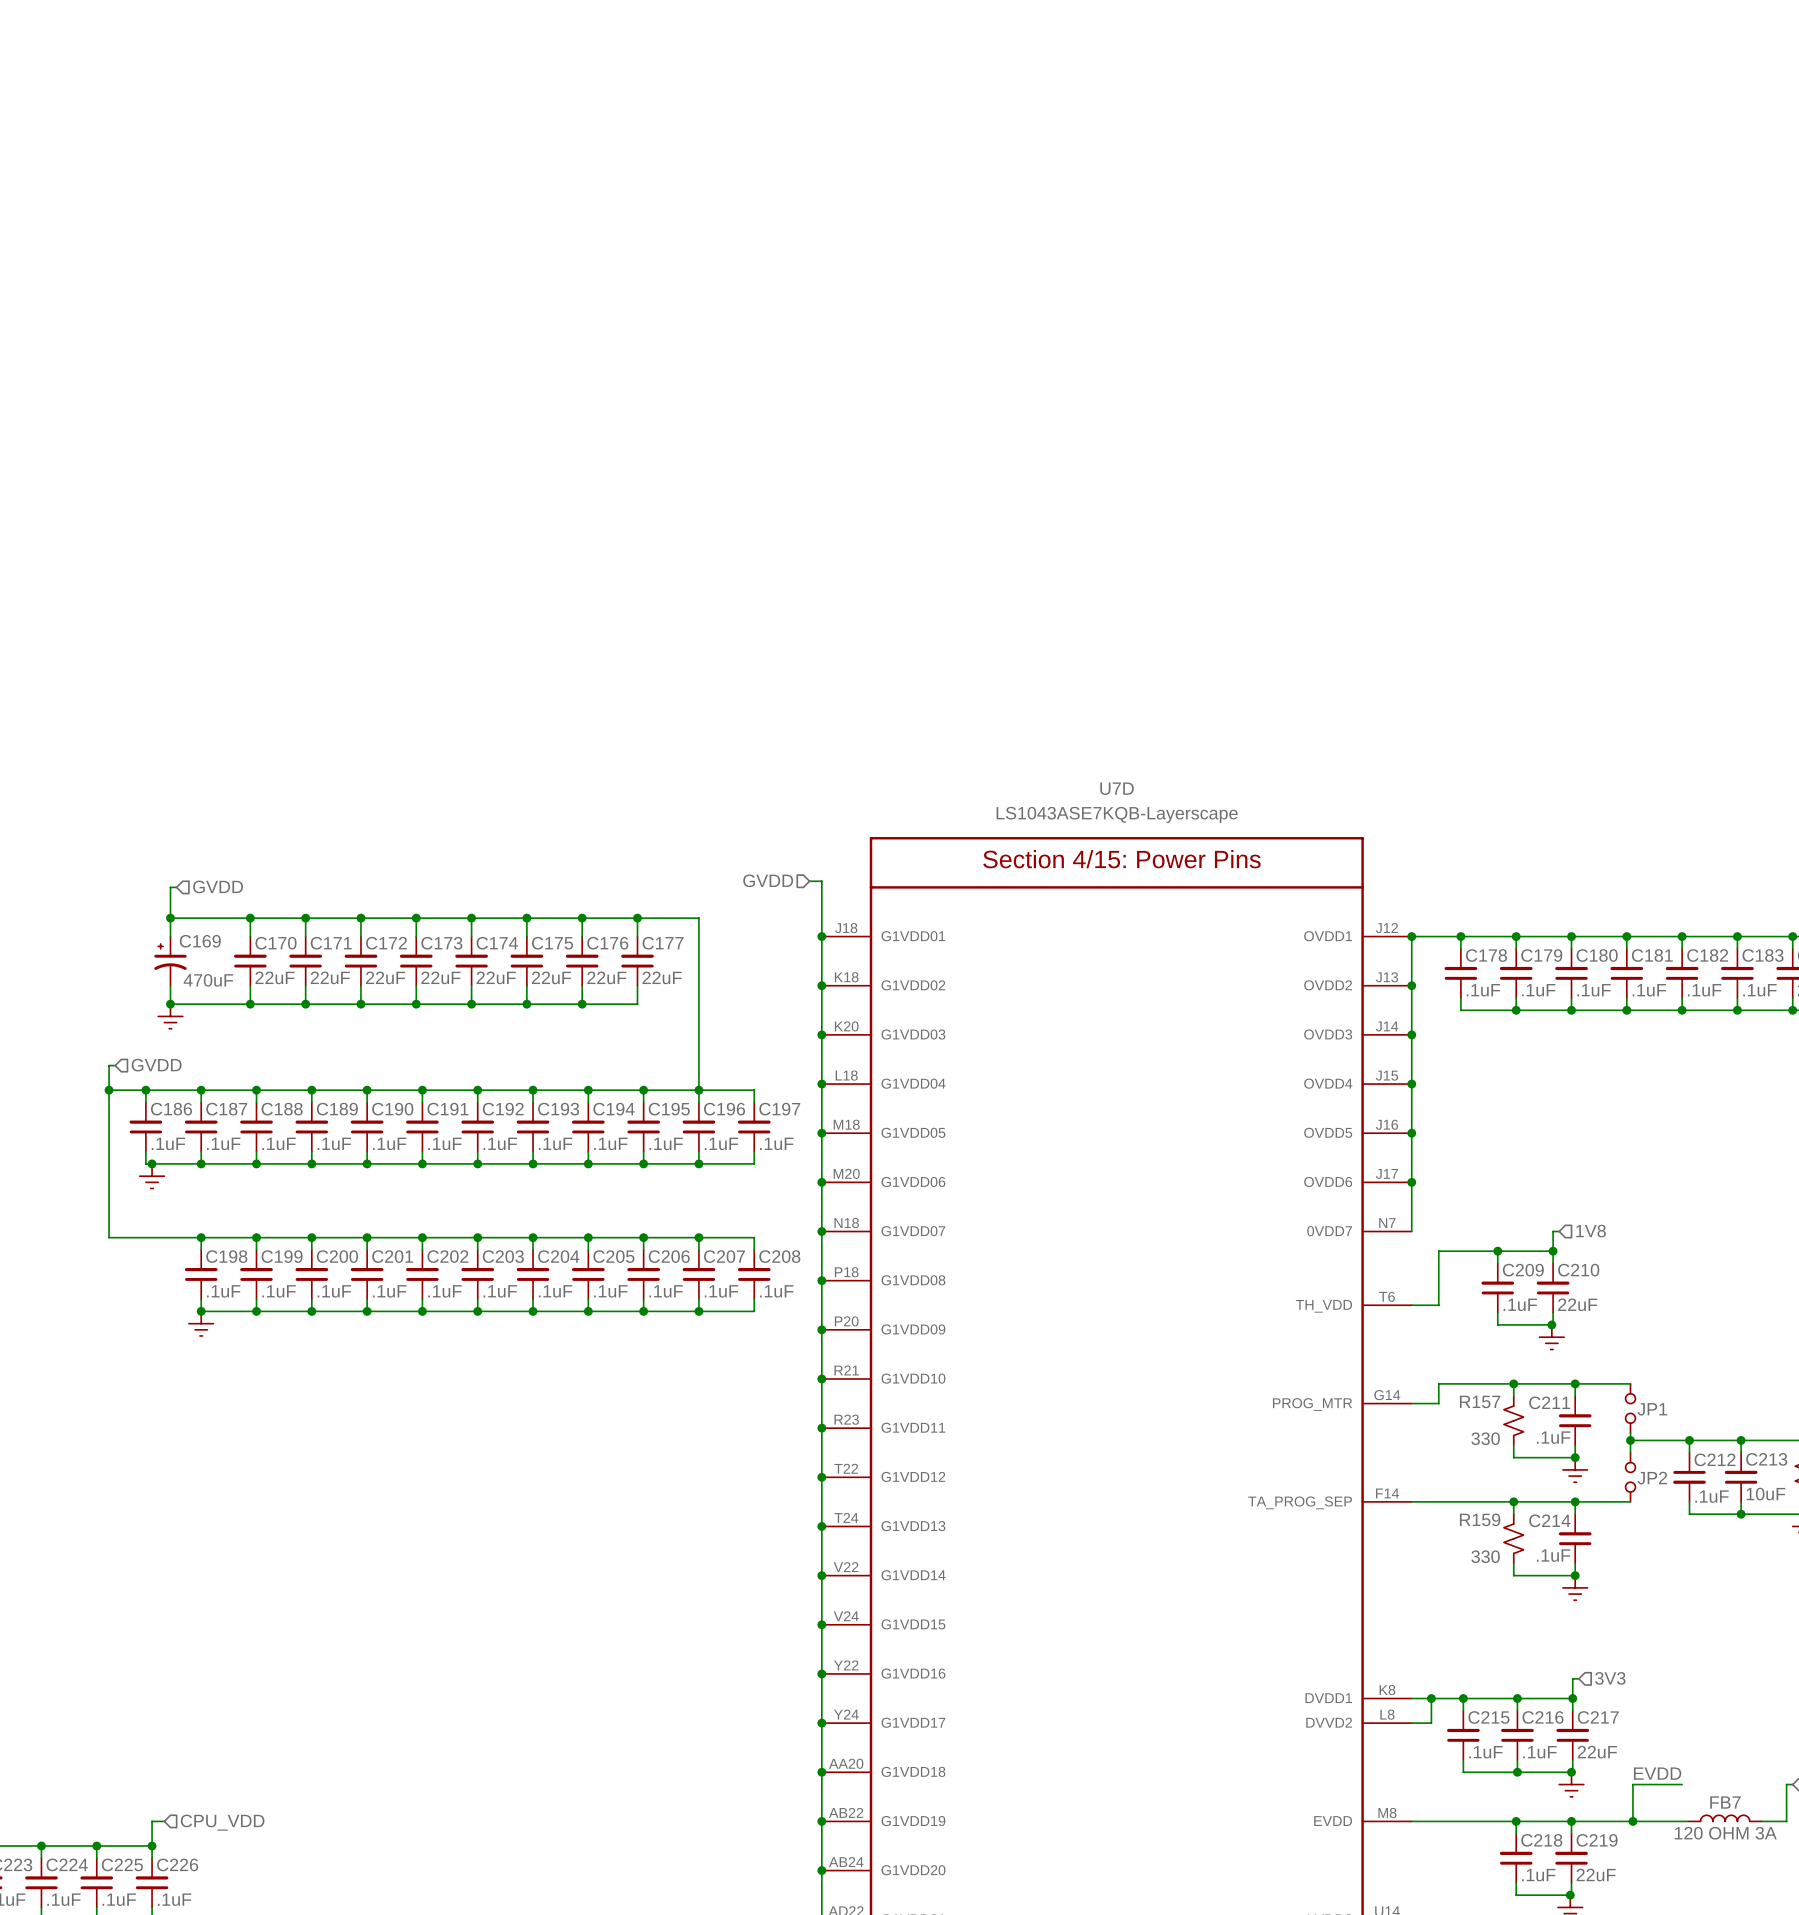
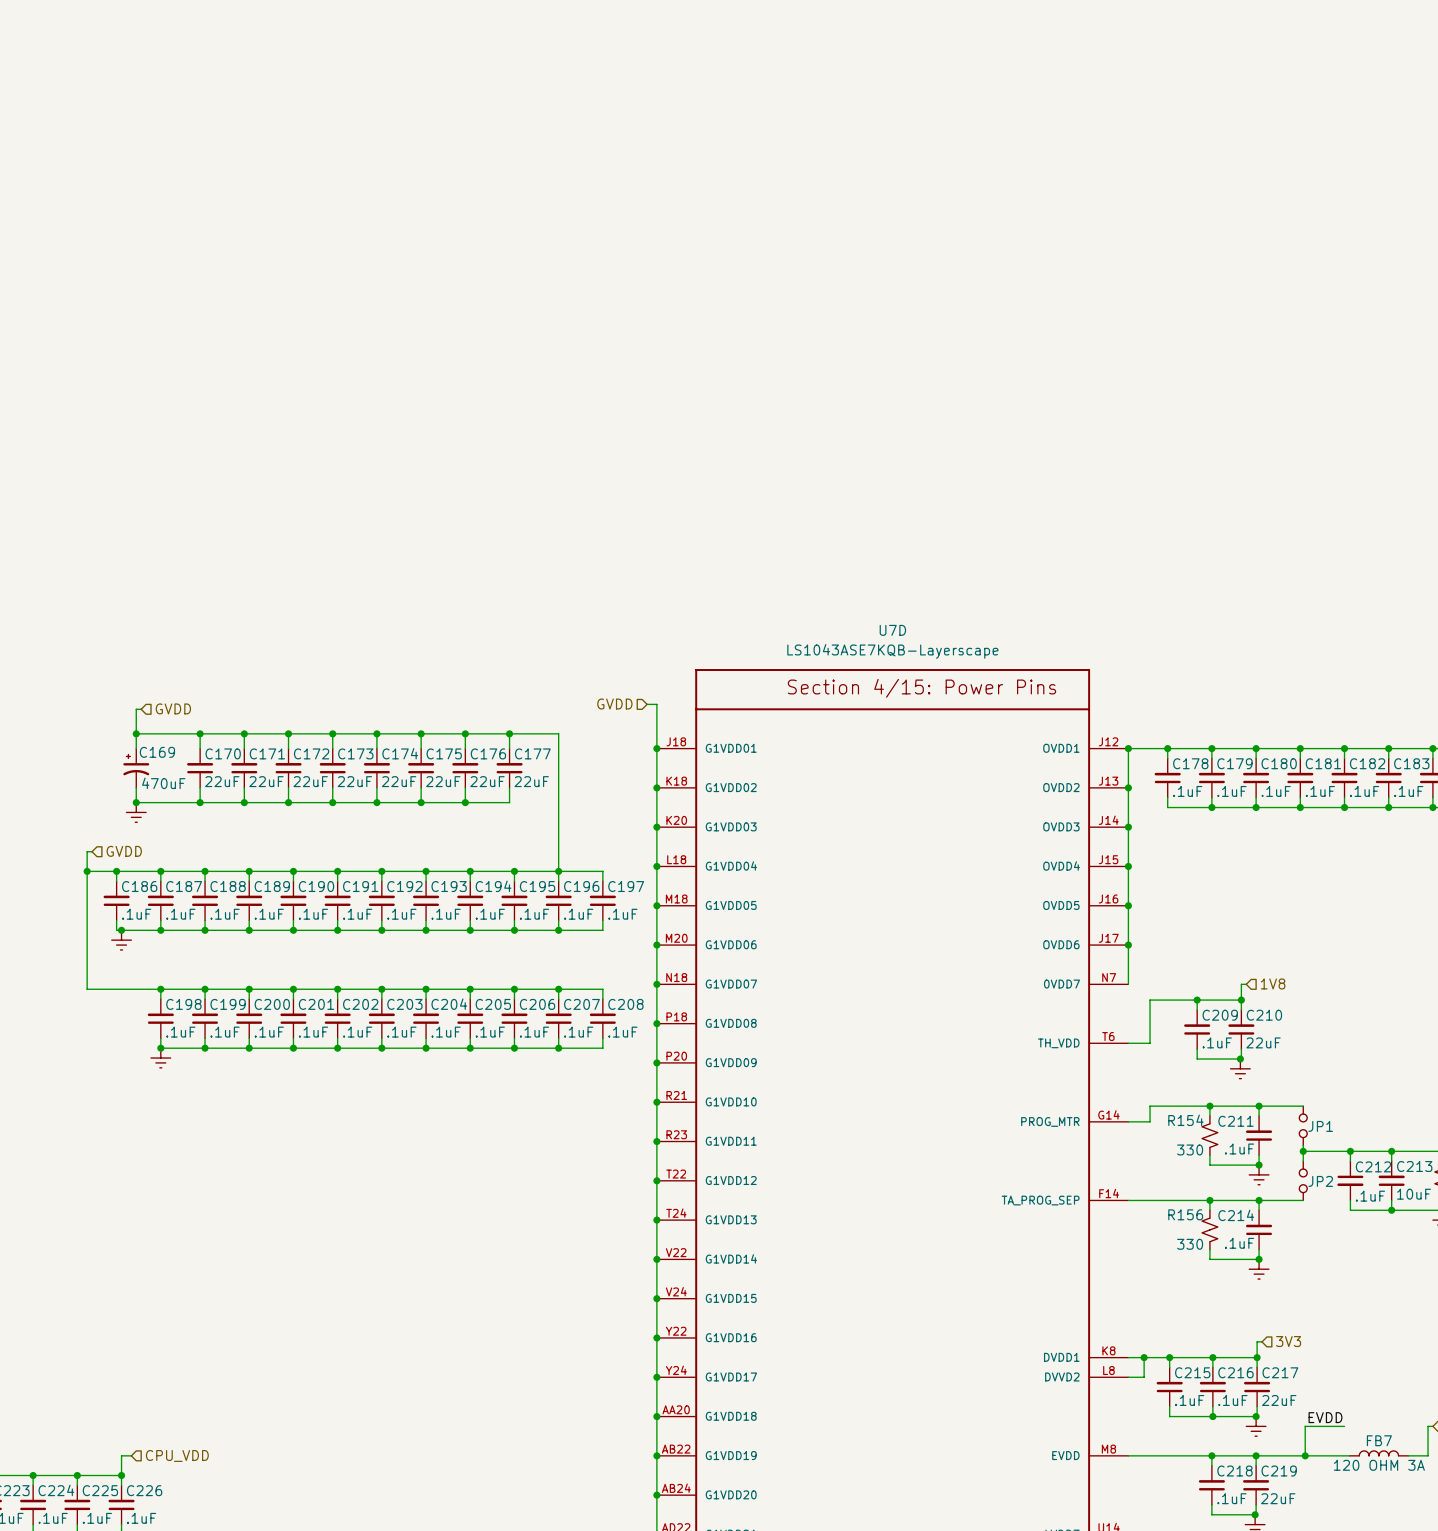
R157 name: R157 (1480, 1401) -> R154 (1185, 1120)
R159 name: R159 (1480, 1519) -> R156 (1185, 1214)

